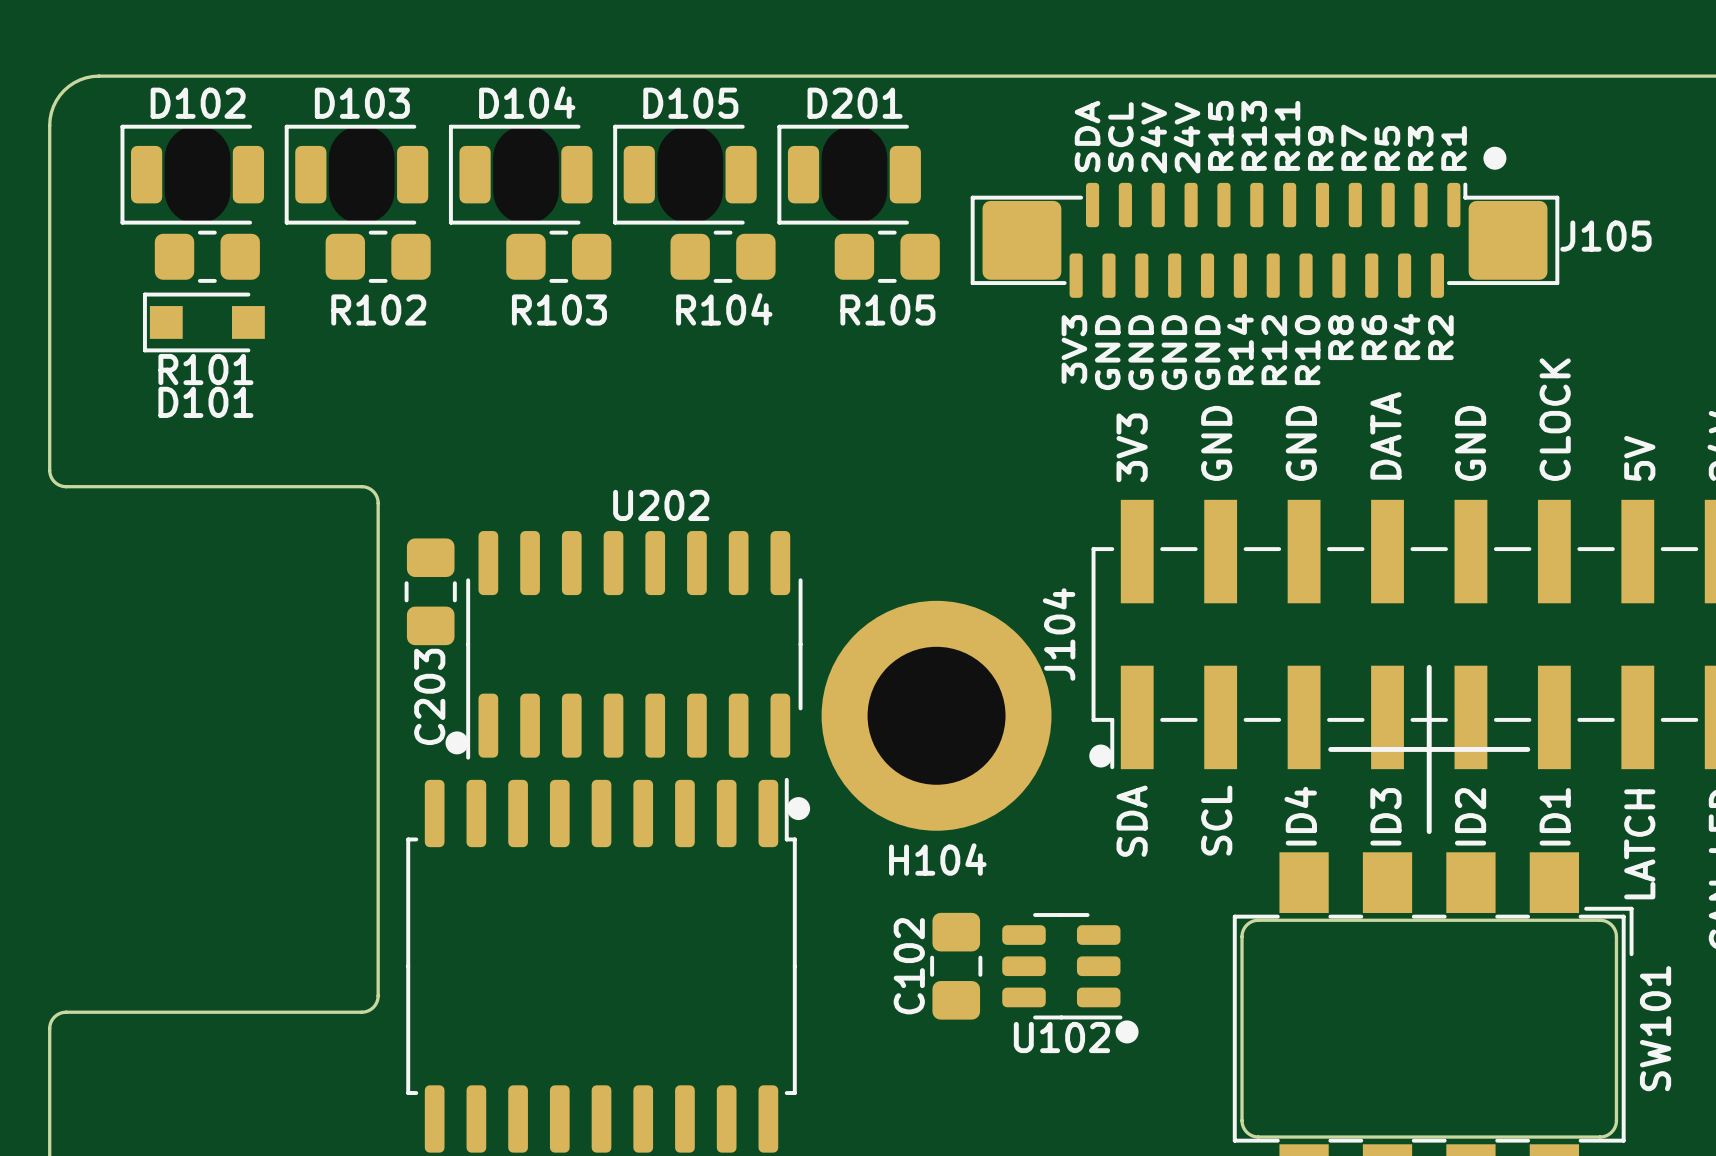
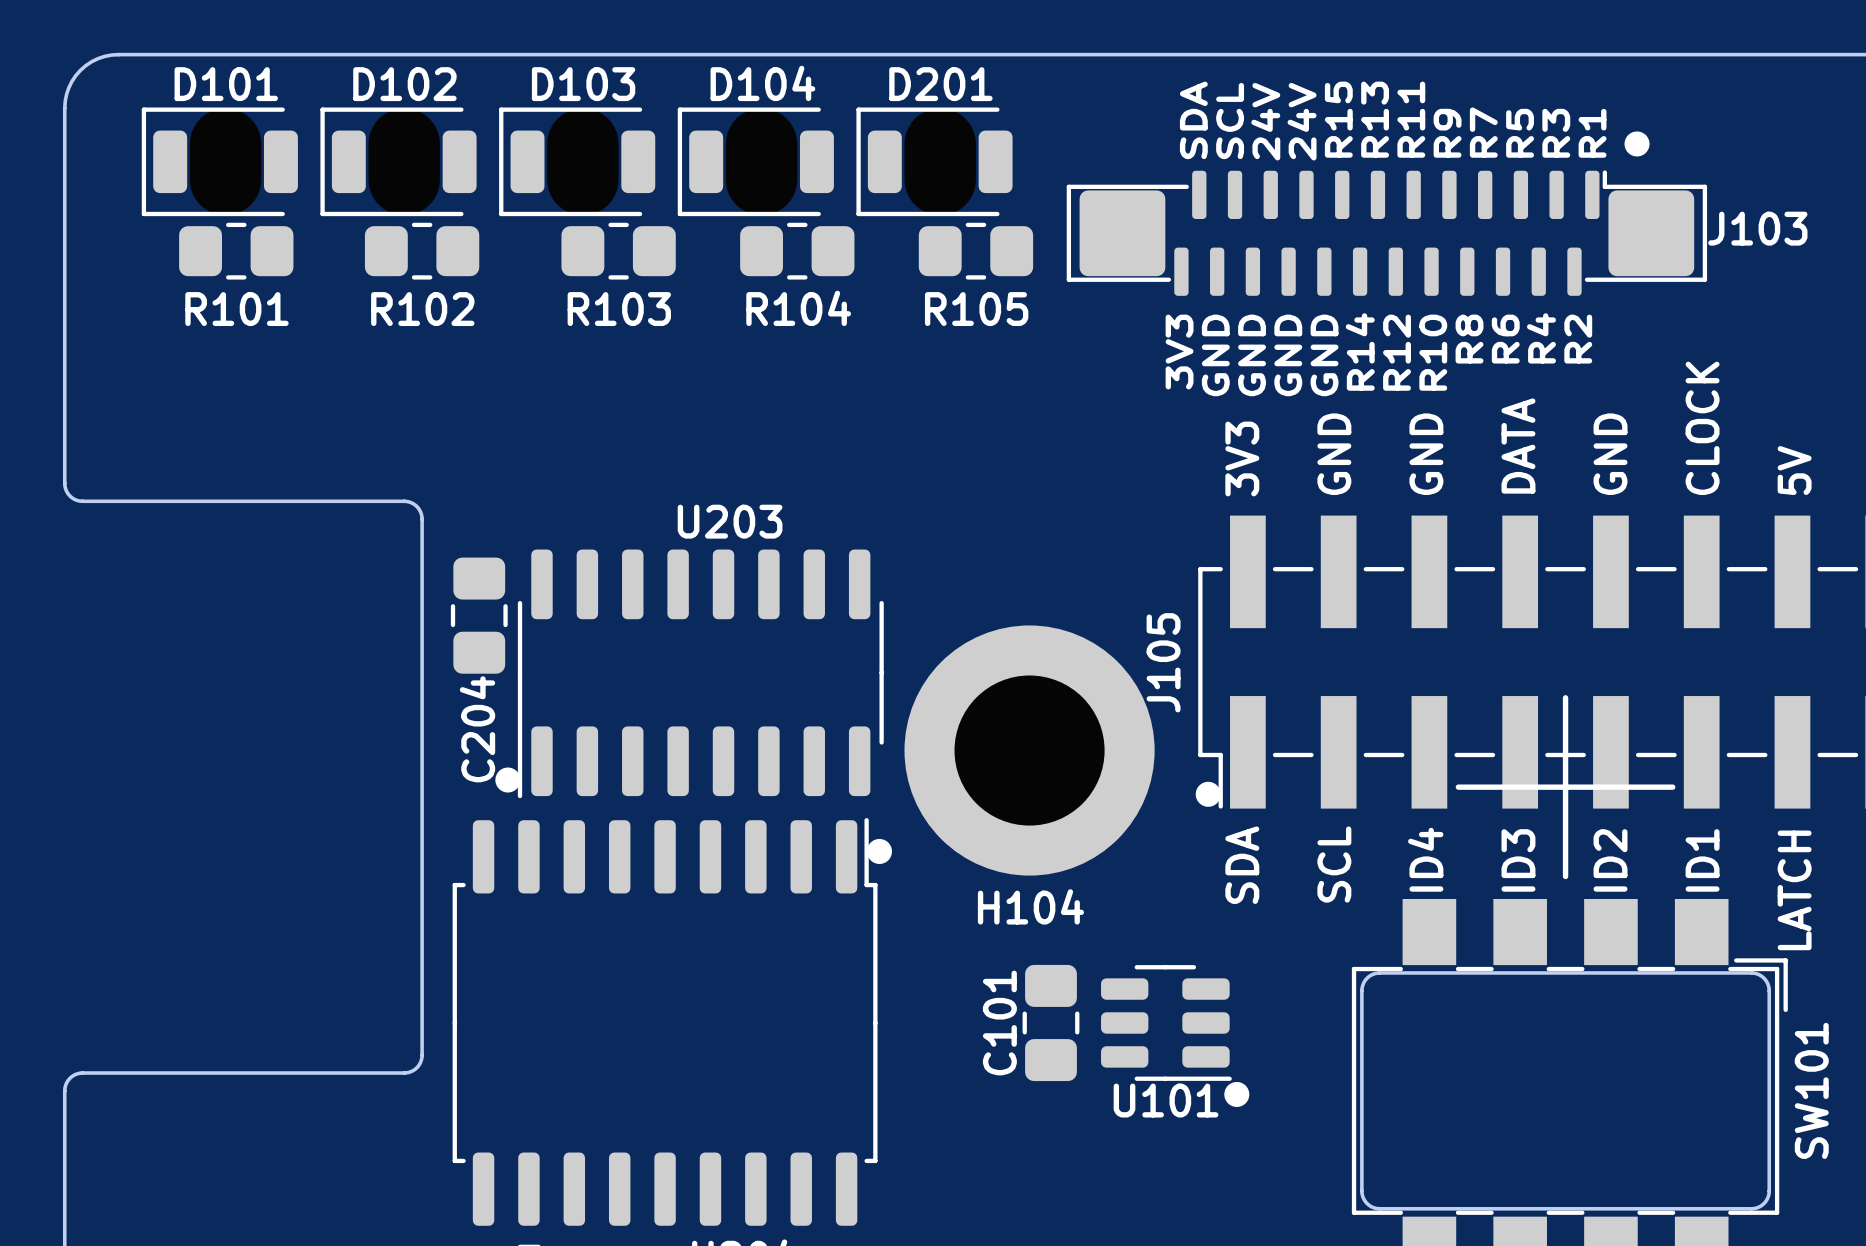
D104 name: D104 (527, 102) -> D103 (583, 84)
D102 name: D102 (198, 103) -> D101 (226, 84)
D103 name: D103 (362, 103) -> D102 (404, 84)
D105 name: D105 (690, 103) -> D104 (762, 83)
J105 name: J105 (1605, 236) -> J103 (1757, 228)
D101: (203, 322) -> none
R101 name position: R101 (205, 369) -> R101 (236, 309)
U202 name: U202 (661, 505) -> U203 (730, 521)
J104 name: J104 (1059, 634) -> J105 (1163, 662)
C203 name: C203 (429, 696) -> C204 (477, 729)
C102 name: C102 (909, 966) -> C101 (999, 1022)
U102 name: U102 (1061, 1037) -> U101 (1166, 1100)

